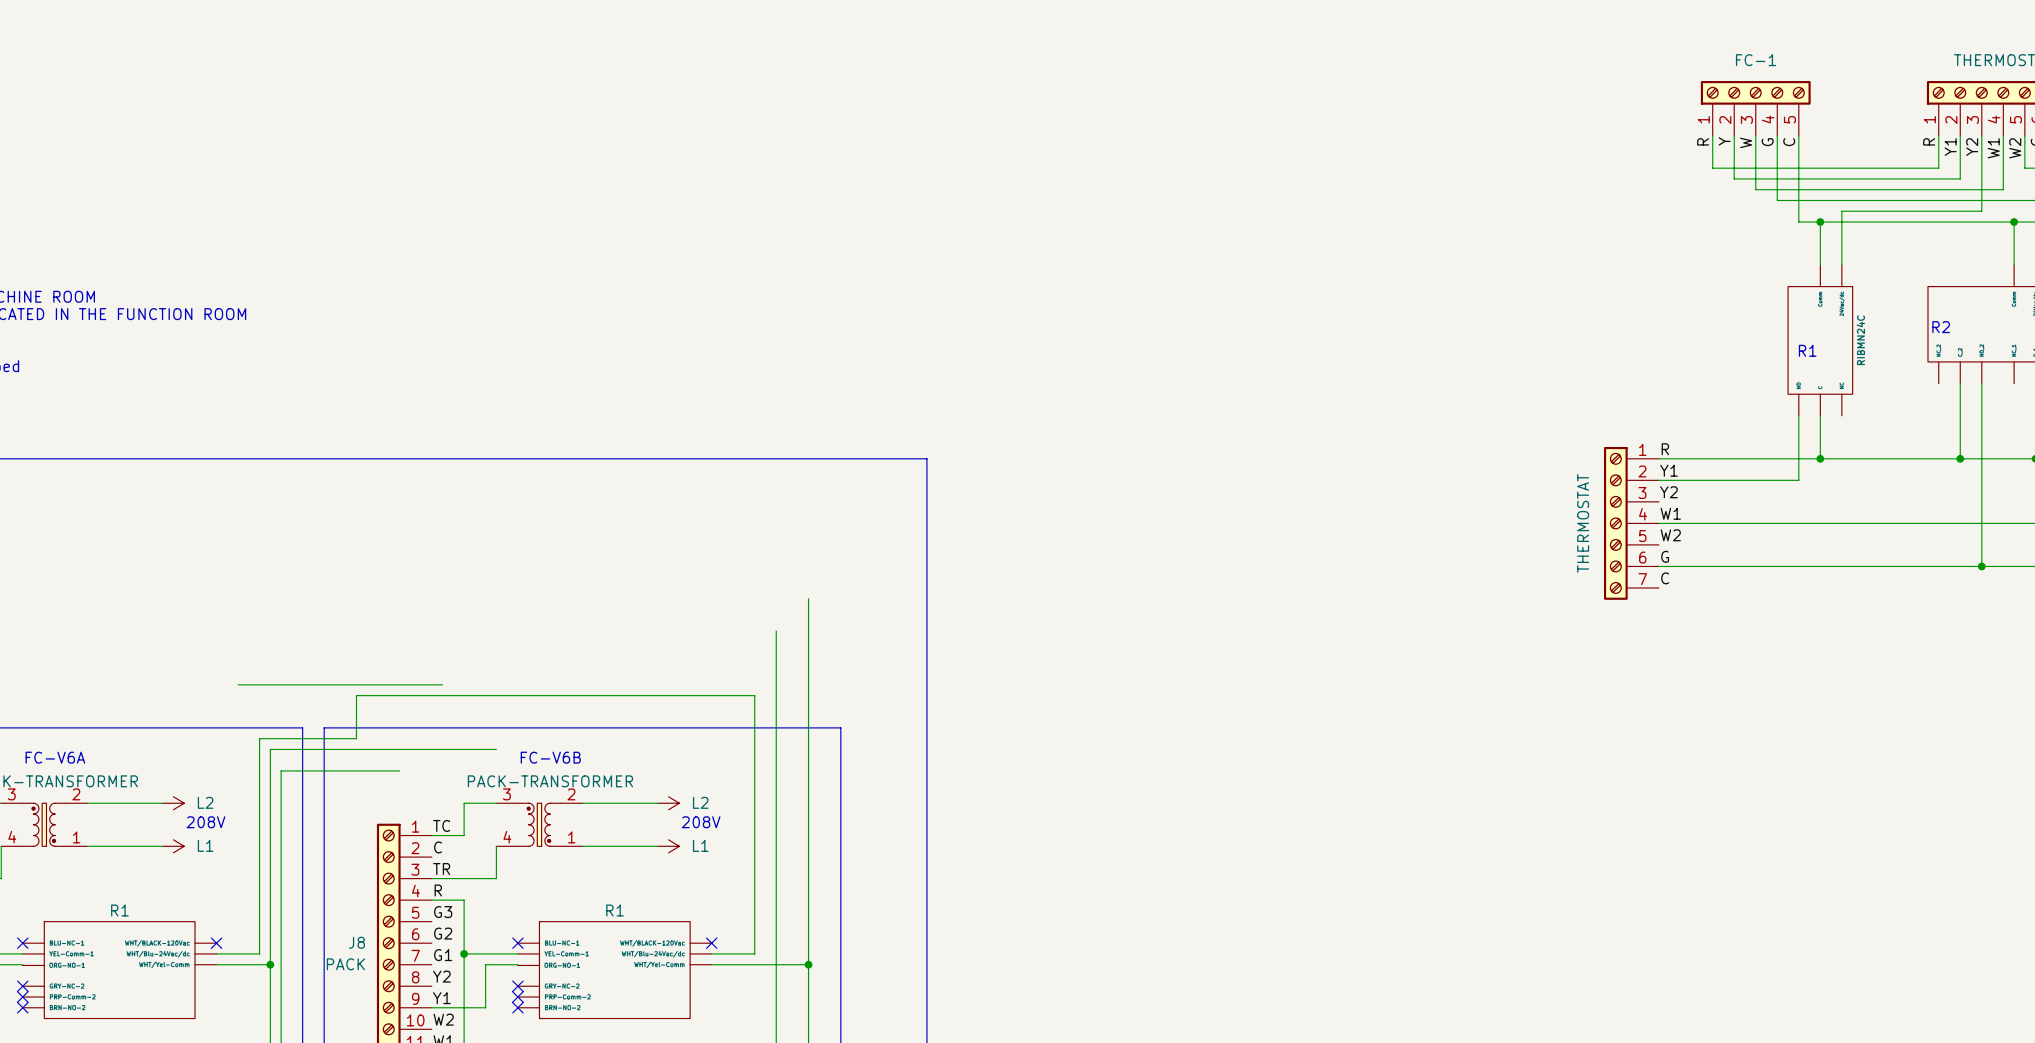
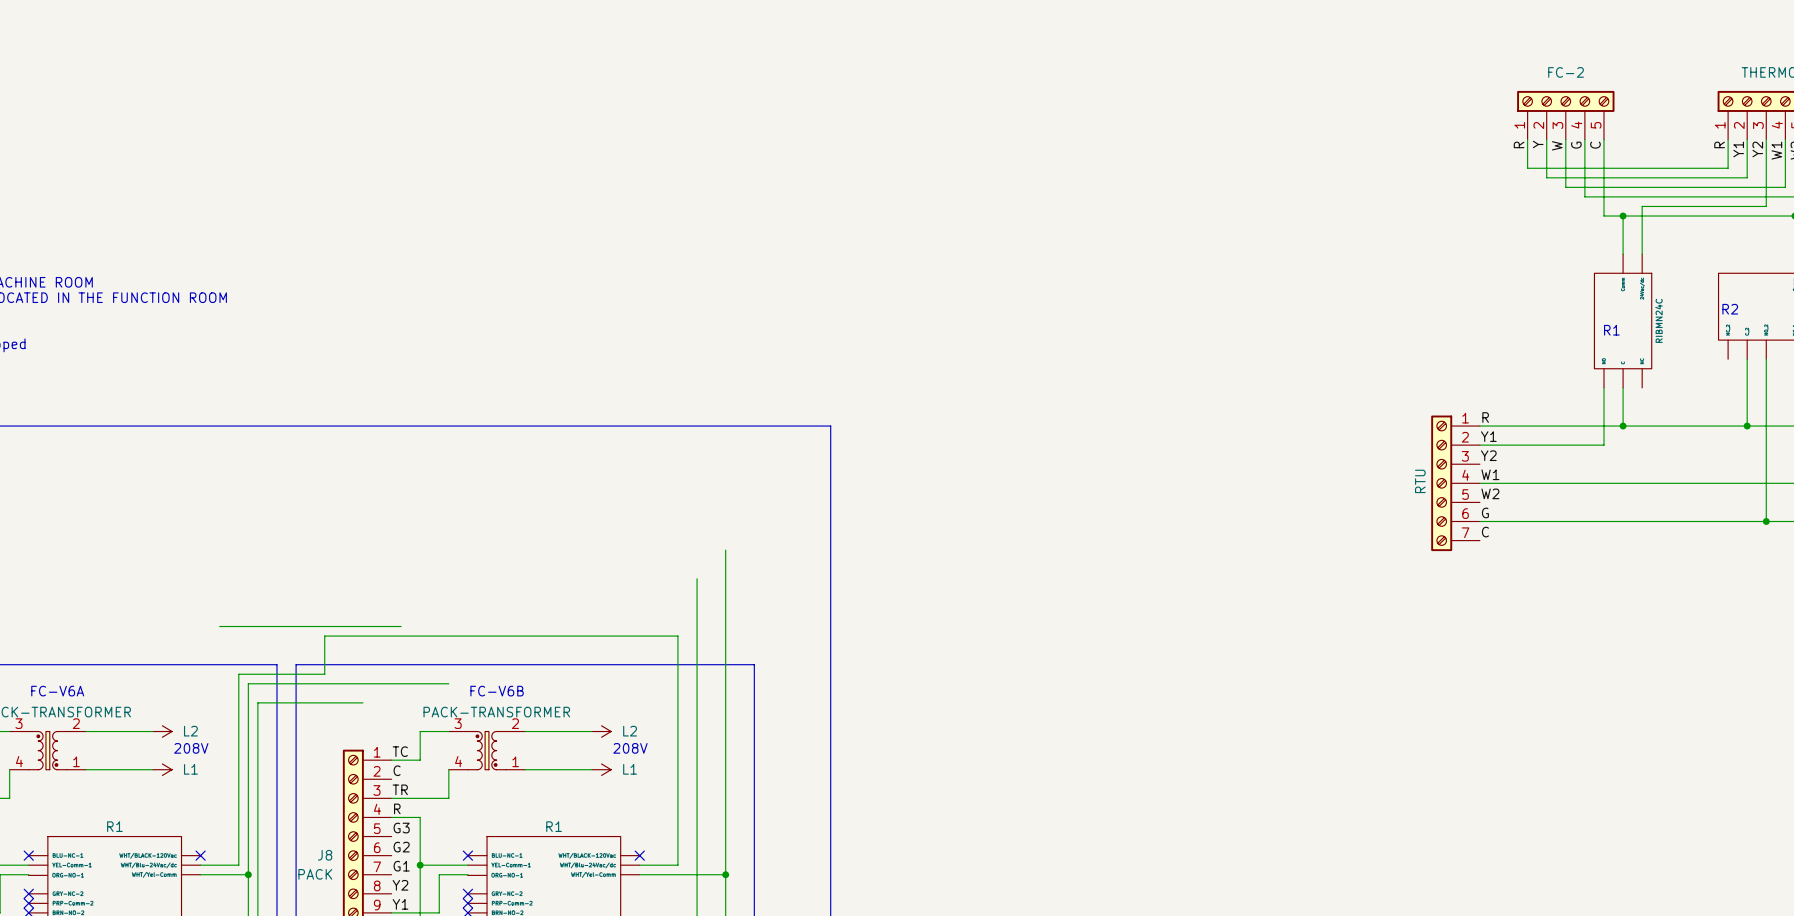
part value: FC-1 (1756, 60) -> FC-2 (1566, 72)
part value: THERMOSTAT (1583, 523) -> RTU (1420, 481)

